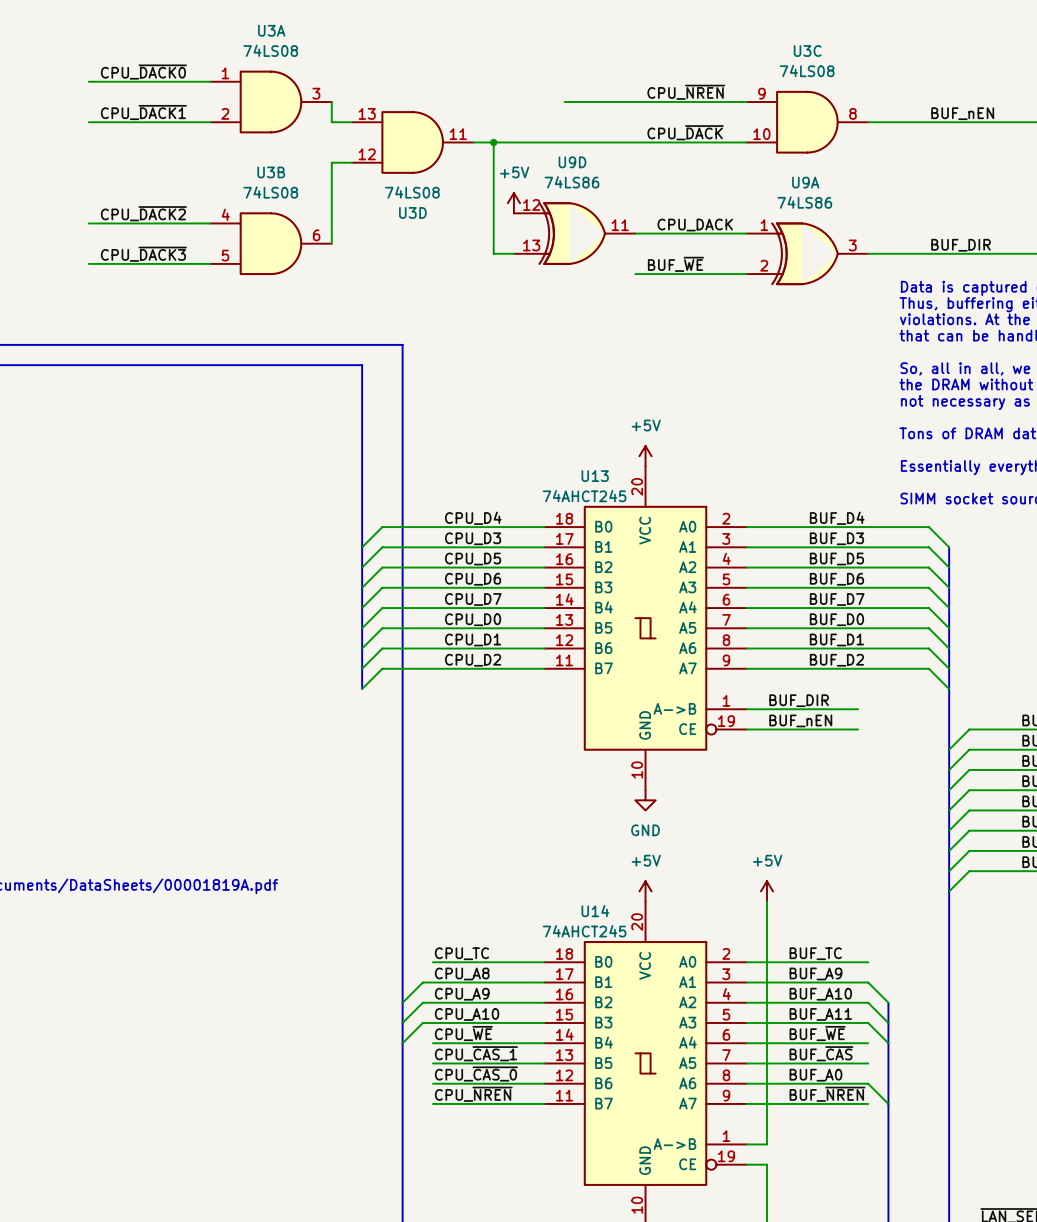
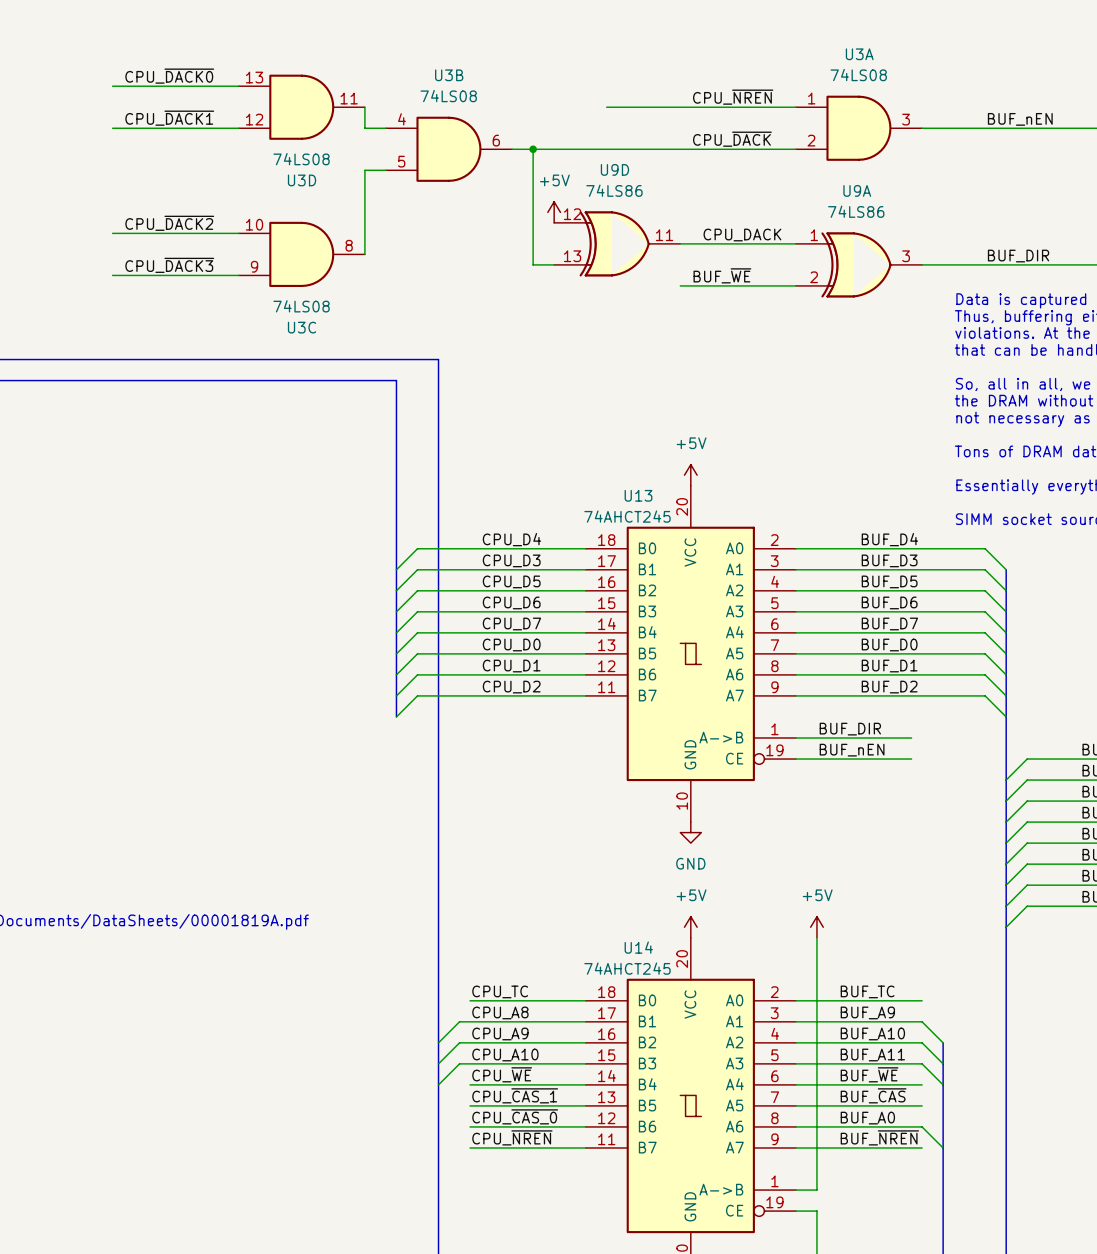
U3A position: (271, 101) -> (859, 128)
U3C flip: as is (807, 122) -> up-down (301, 254)
U3C position: (807, 122) -> (301, 254)
U3D position: (412, 142) -> (301, 107)
U3B position: (271, 243) -> (449, 149)

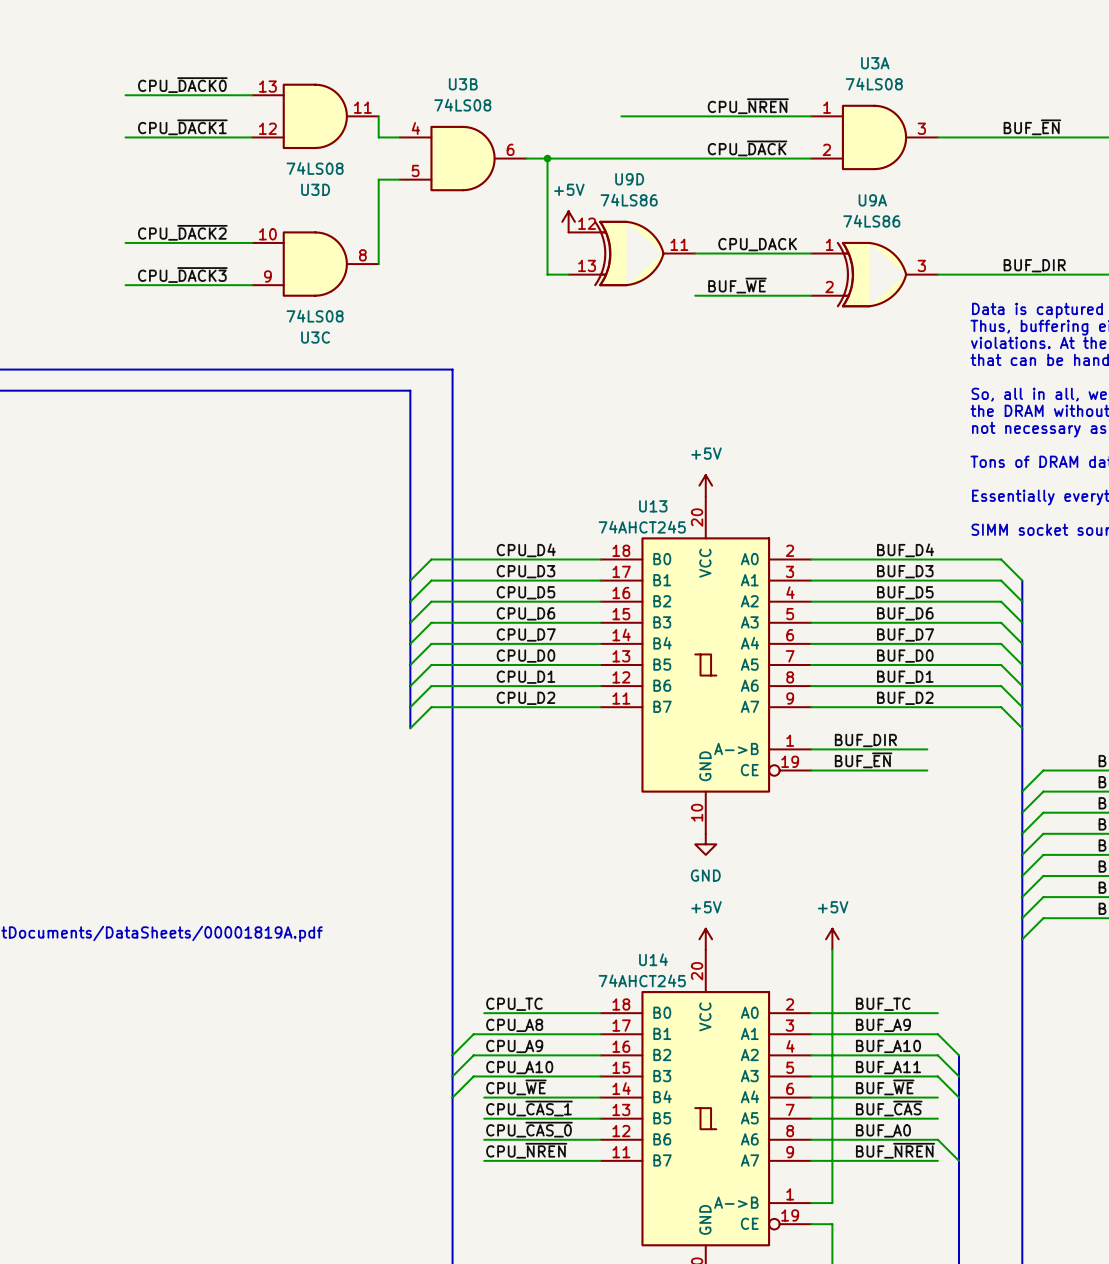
label: BUF_nEN (1020, 119) -> BUF_~{EN} (1032, 127)
label: BUF_nEN (852, 750) -> BUF_~{EN} (863, 760)

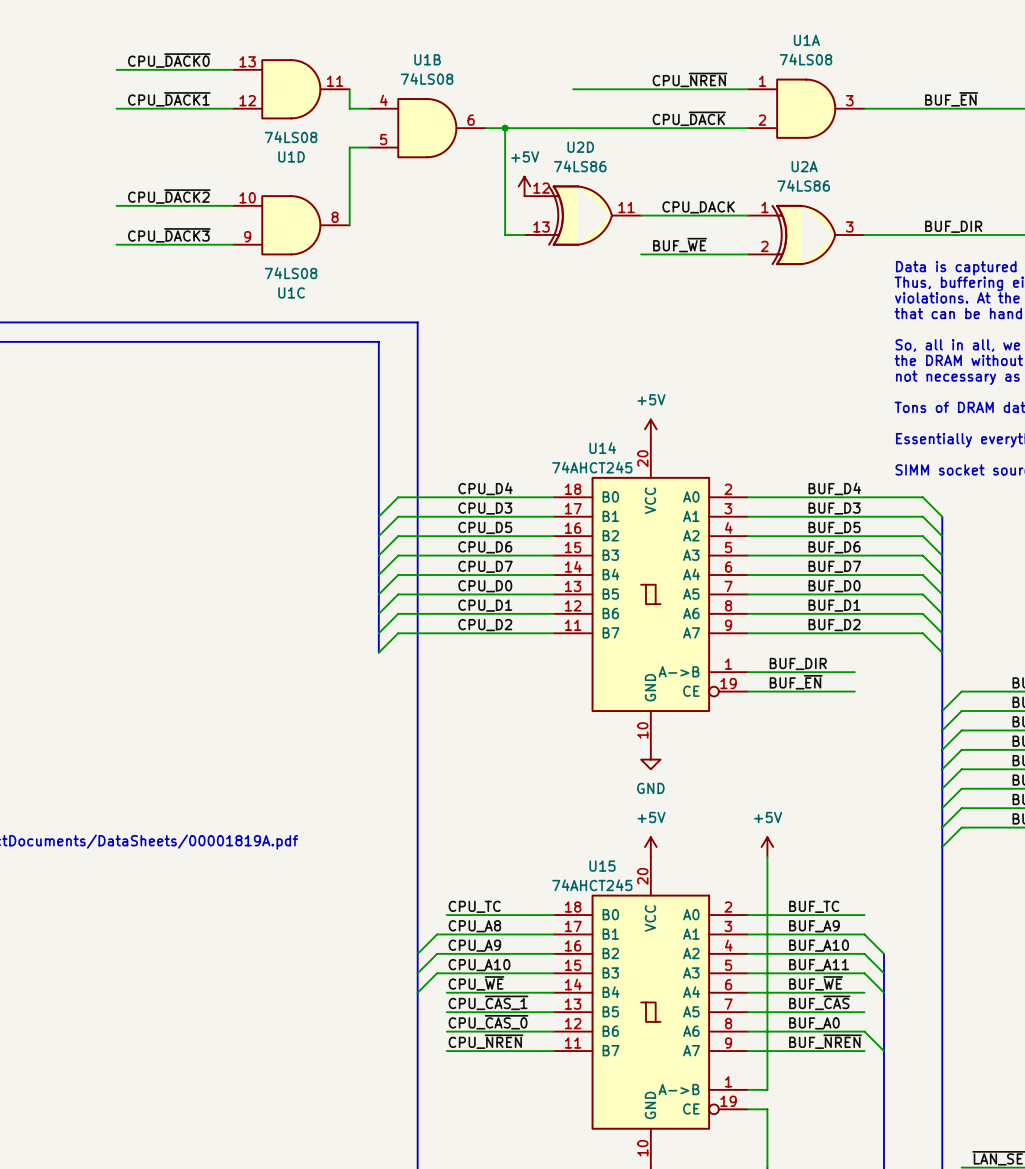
U3A name: U3A (875, 63) -> U1A (806, 40)
U3B name: U3B (463, 84) -> U1B (427, 59)
U9D name: U9D (629, 179) -> U2D (580, 147)
U3D name: U3D (315, 189) -> U1D (291, 156)
U9A name: U9A (872, 200) -> U2A (804, 166)
U3C name: U3C (315, 337) -> U1C (291, 292)
U13 name: U13 (653, 506) -> U14 (602, 448)
U14 name: U14 (653, 959) -> U15 (602, 866)

